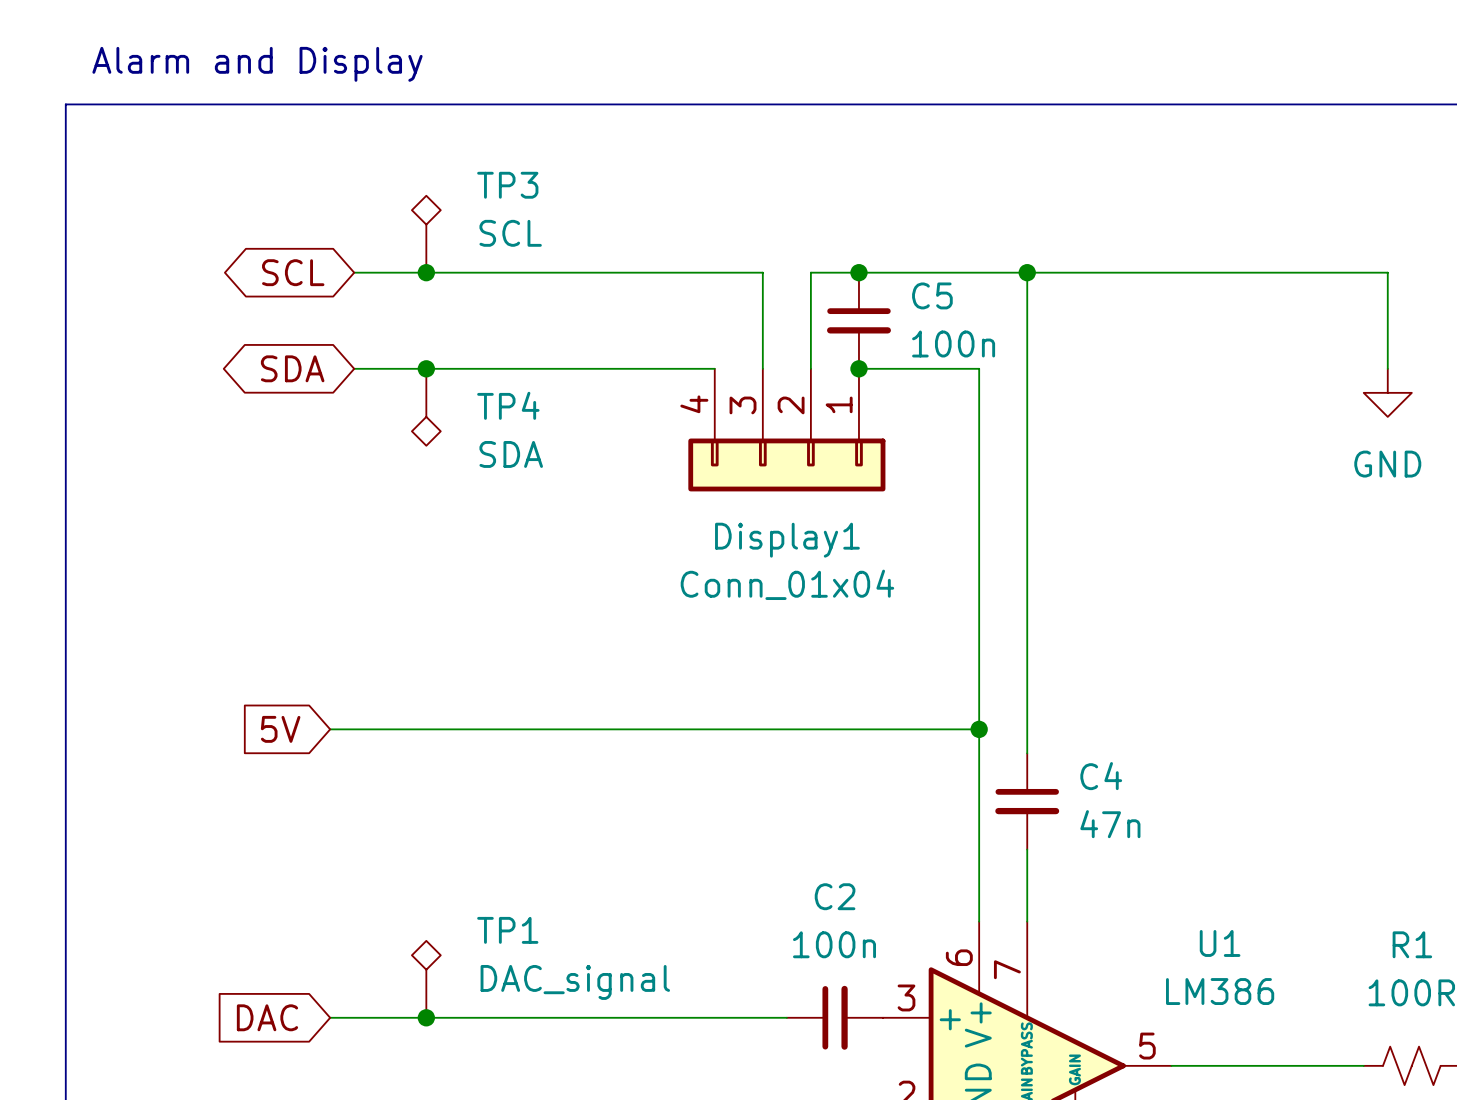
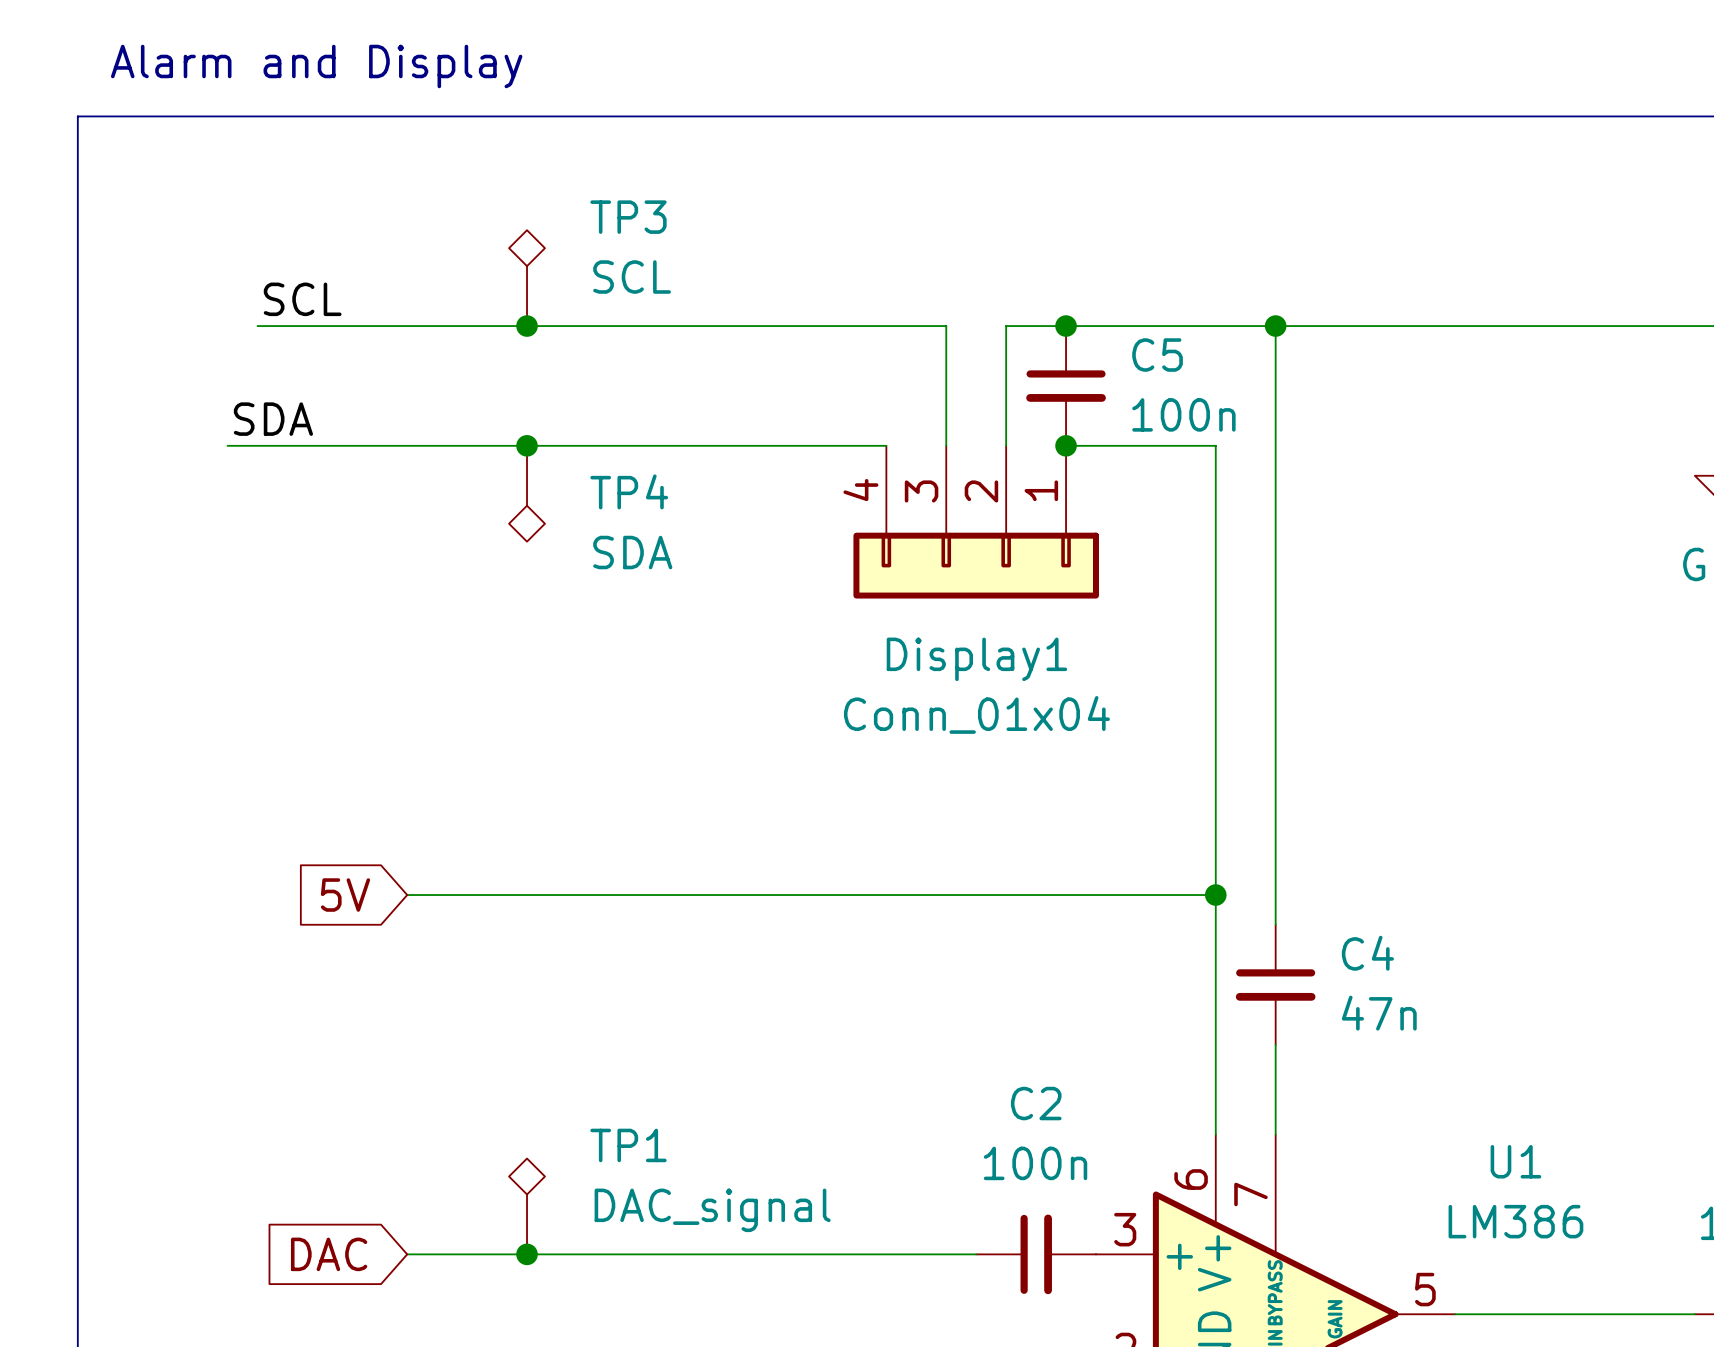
label: none -> SCL (302, 299)
wire: none -> (257, 326) (437, 326)
global label: SCL (293, 272) -> none
label: none -> SDA (273, 419)
wire: none -> (227, 445) (437, 445)
global label: SDA (292, 368) -> none

